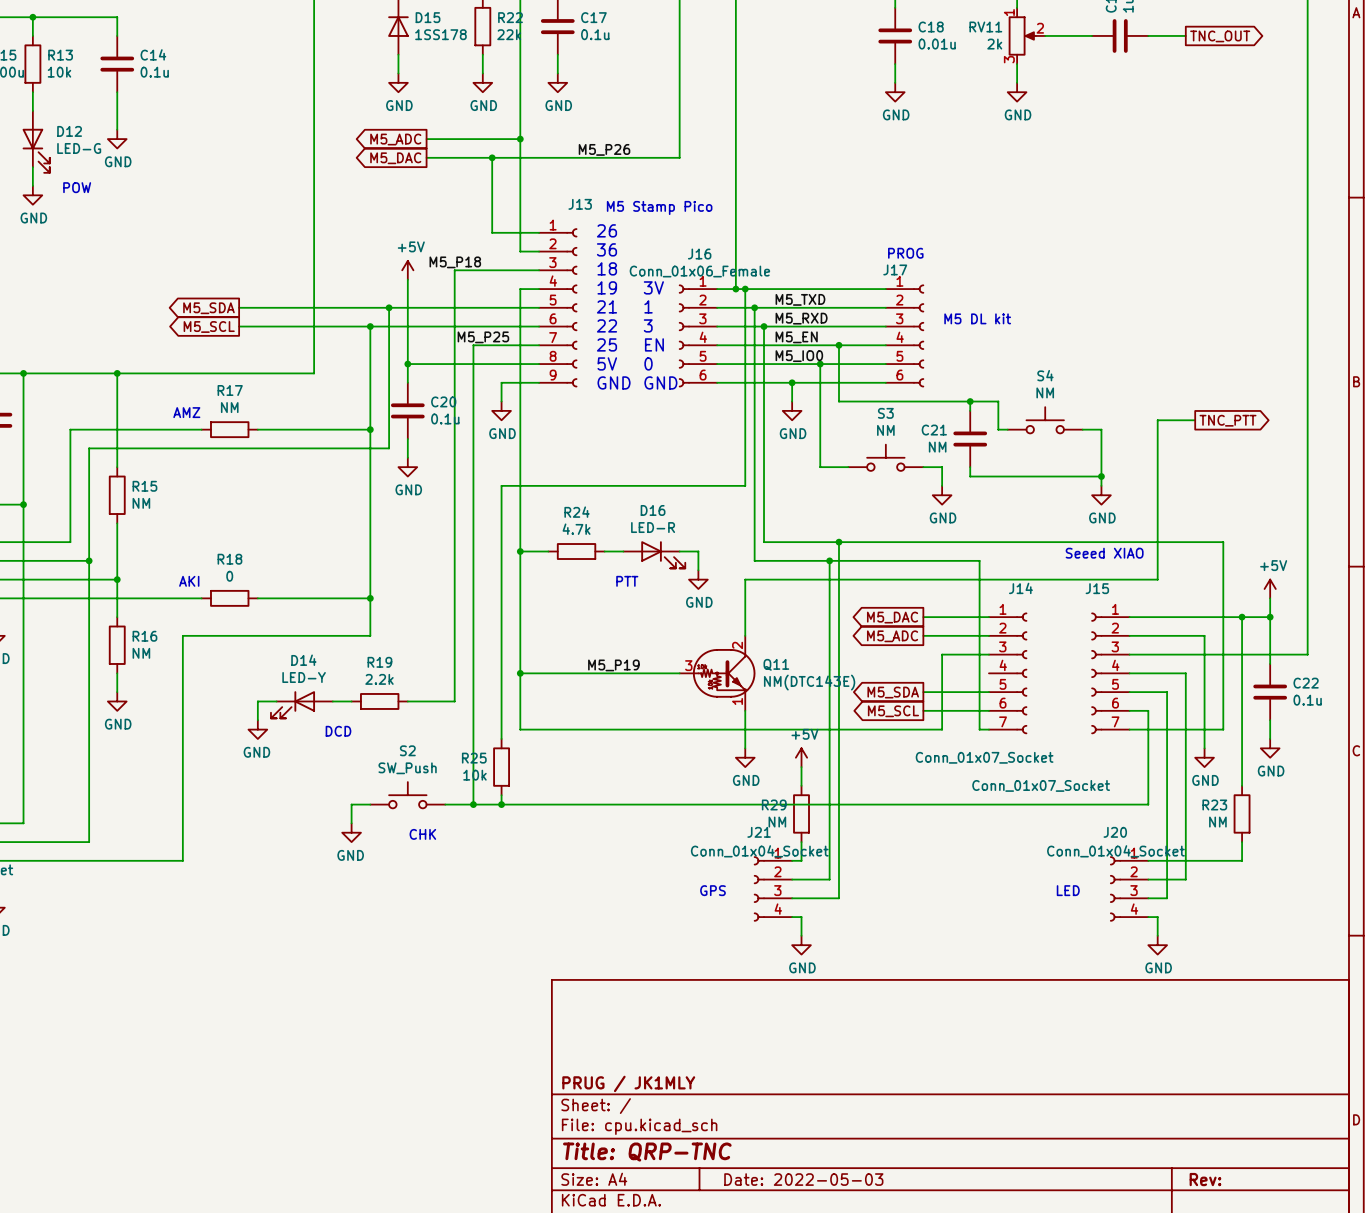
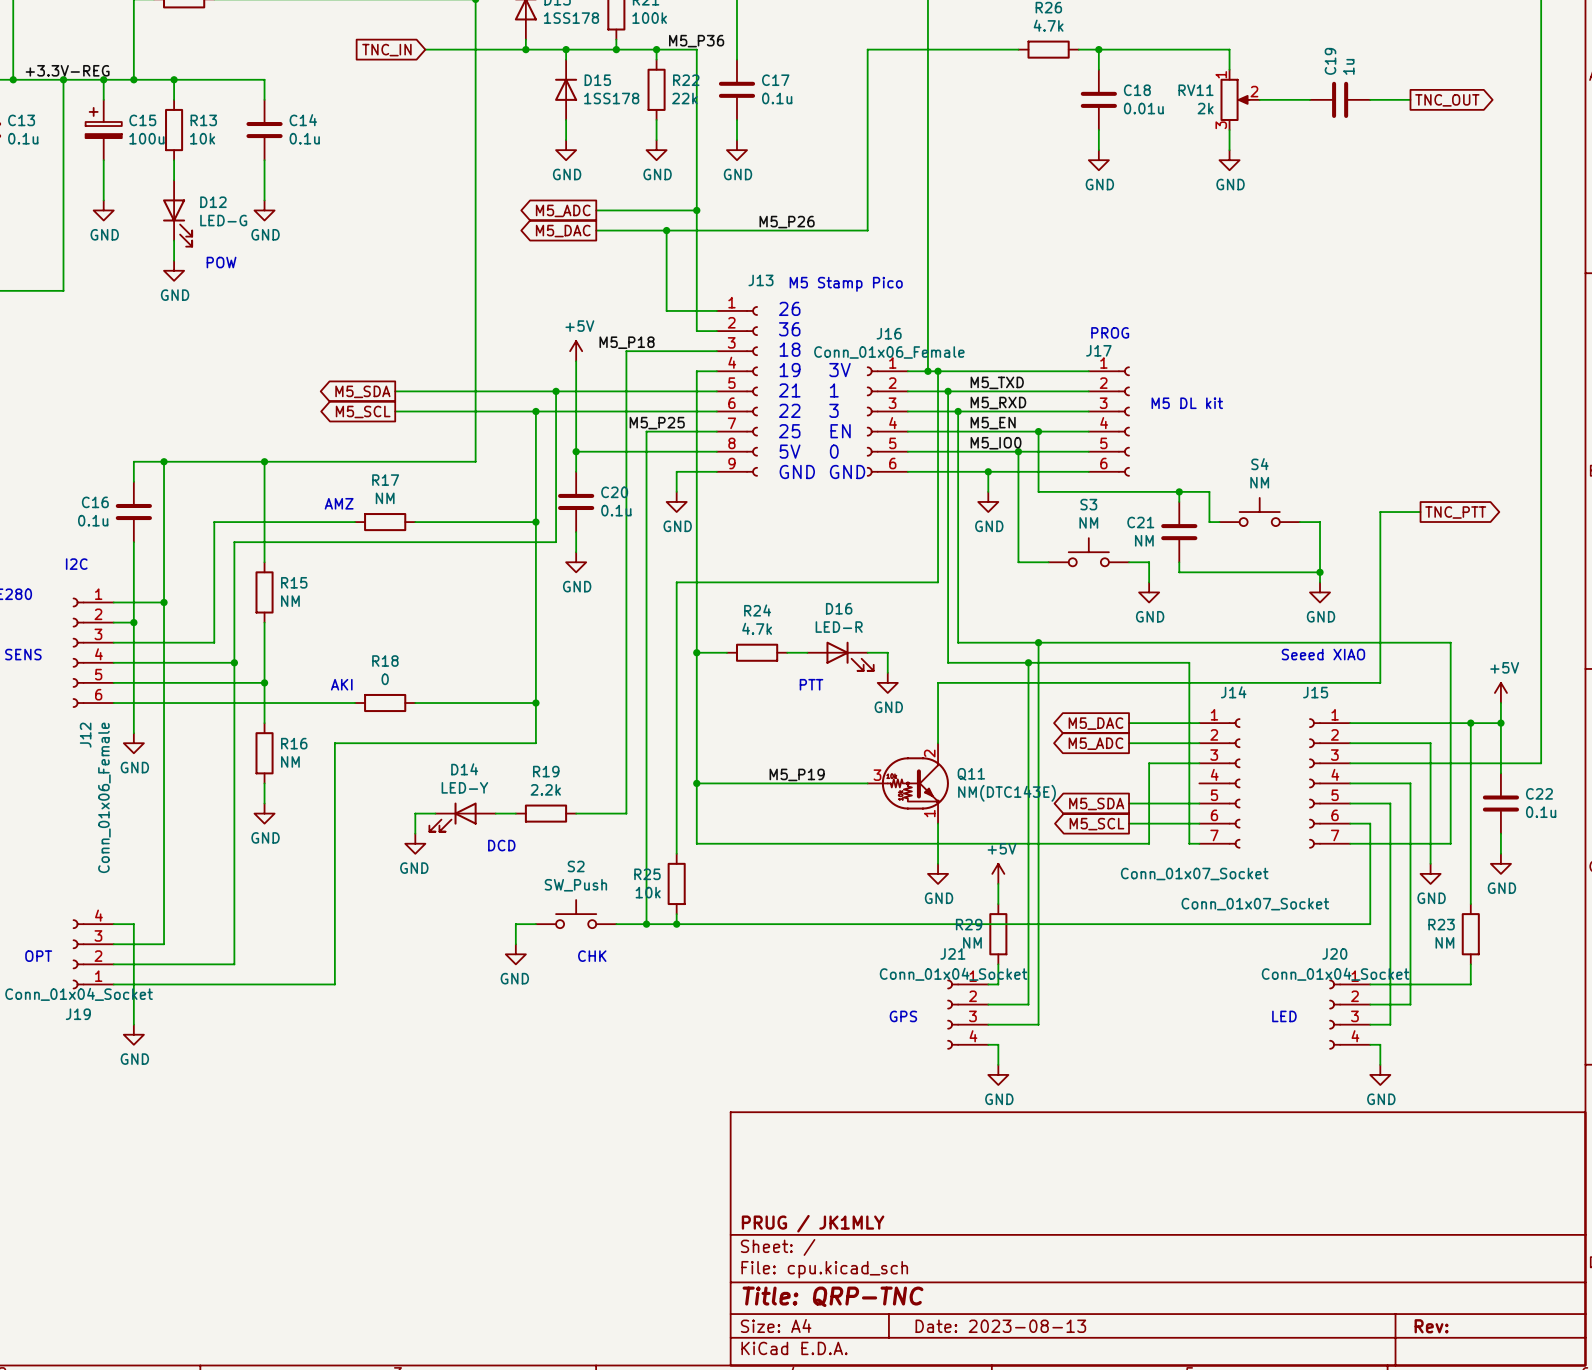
title block: Date: 2022-05-03 (803, 1179) -> Date: 2023-08-13 (1000, 1326)

